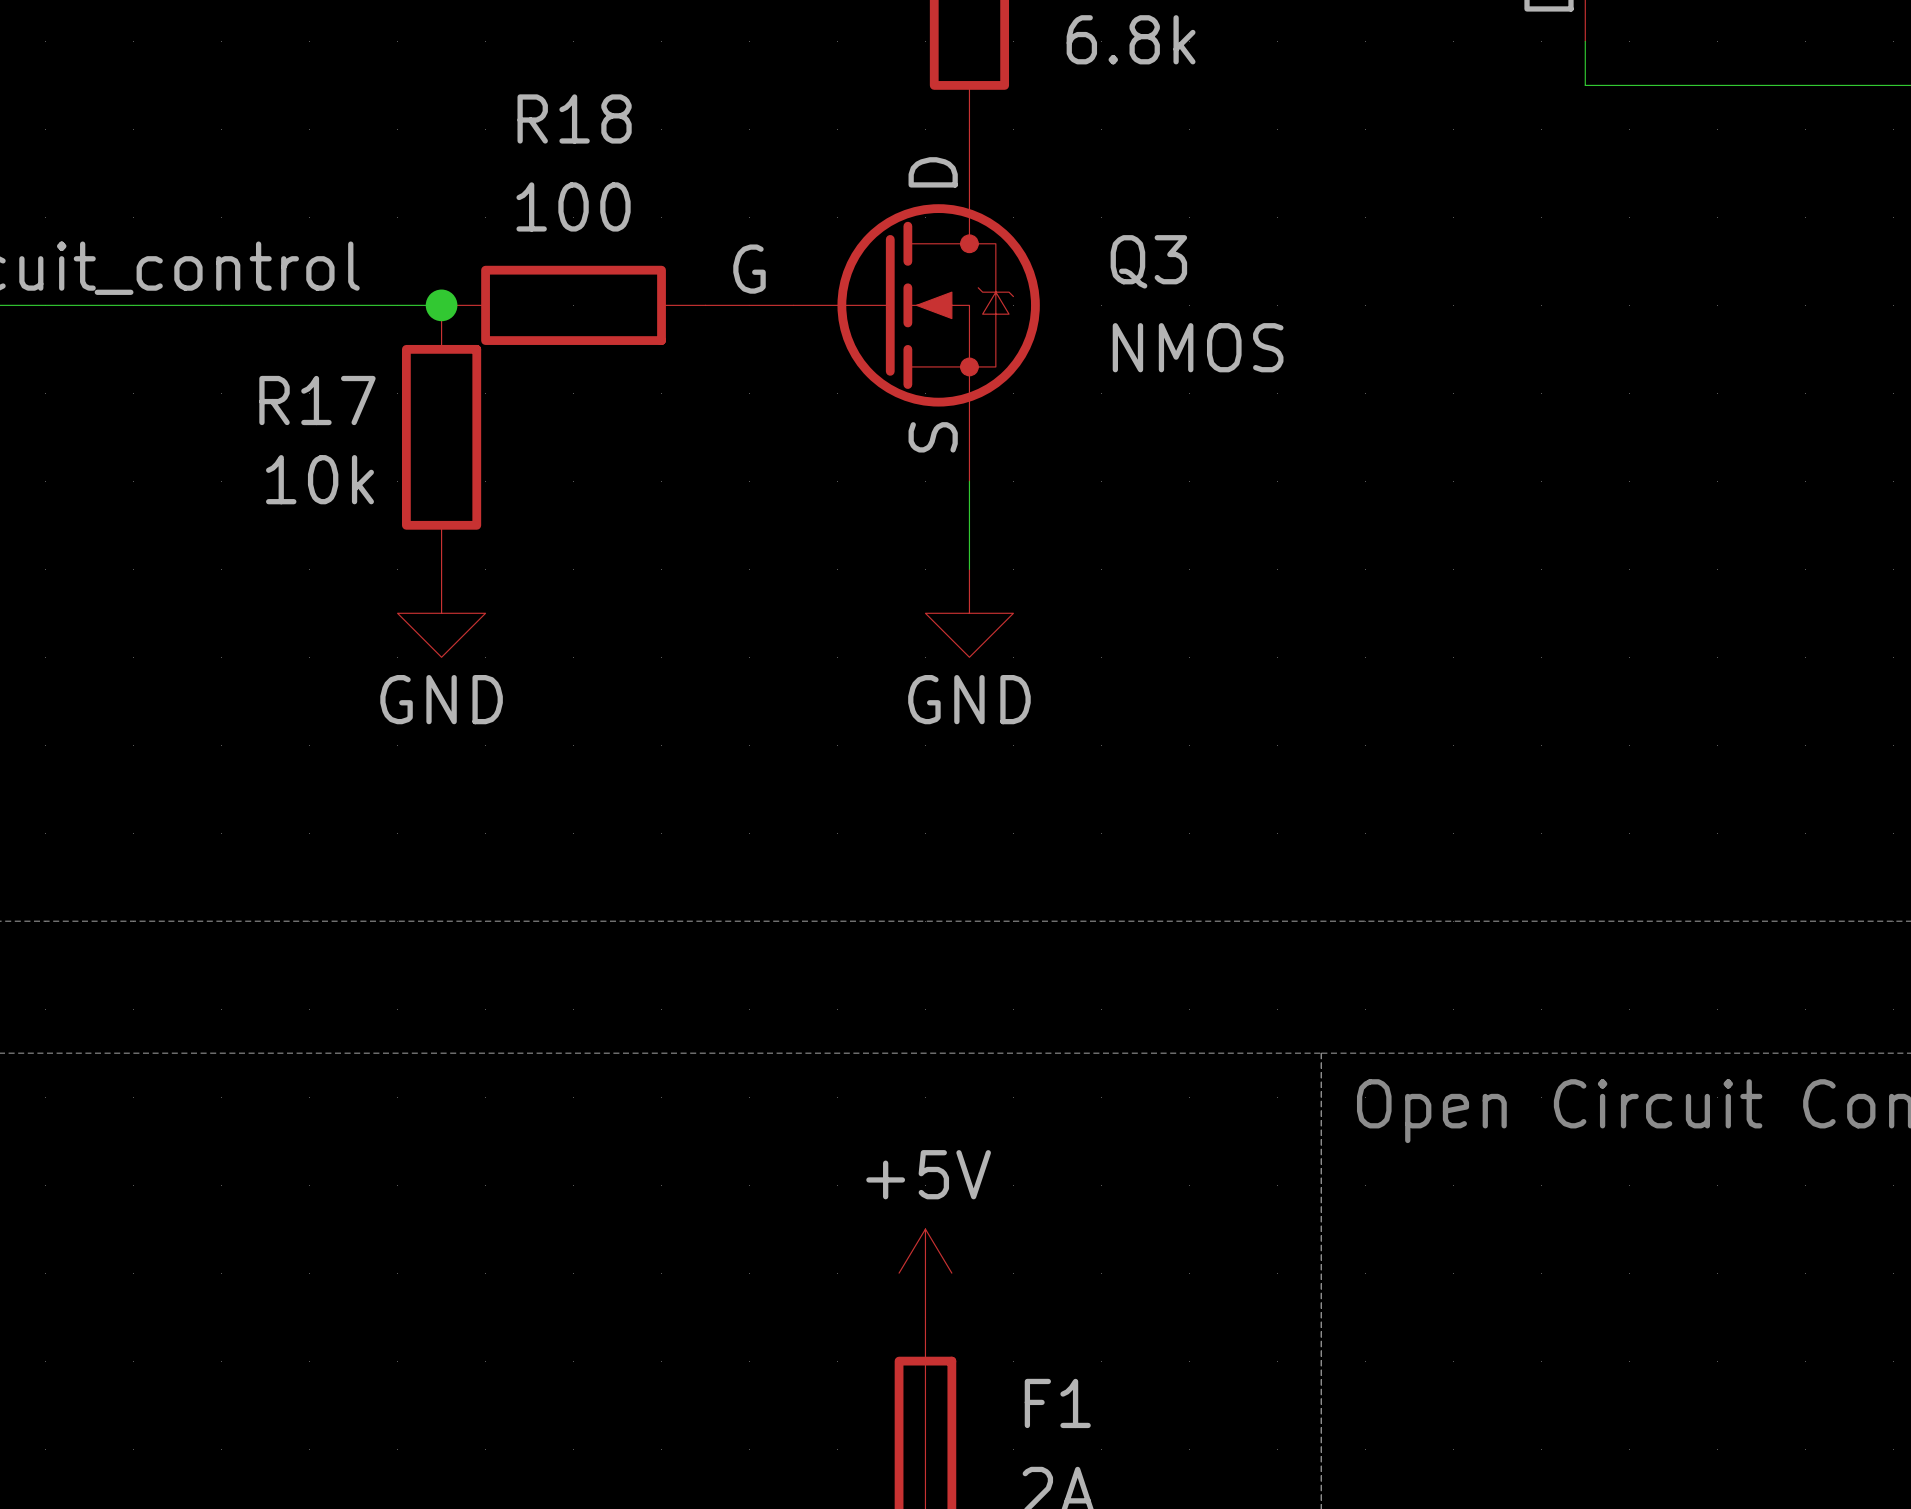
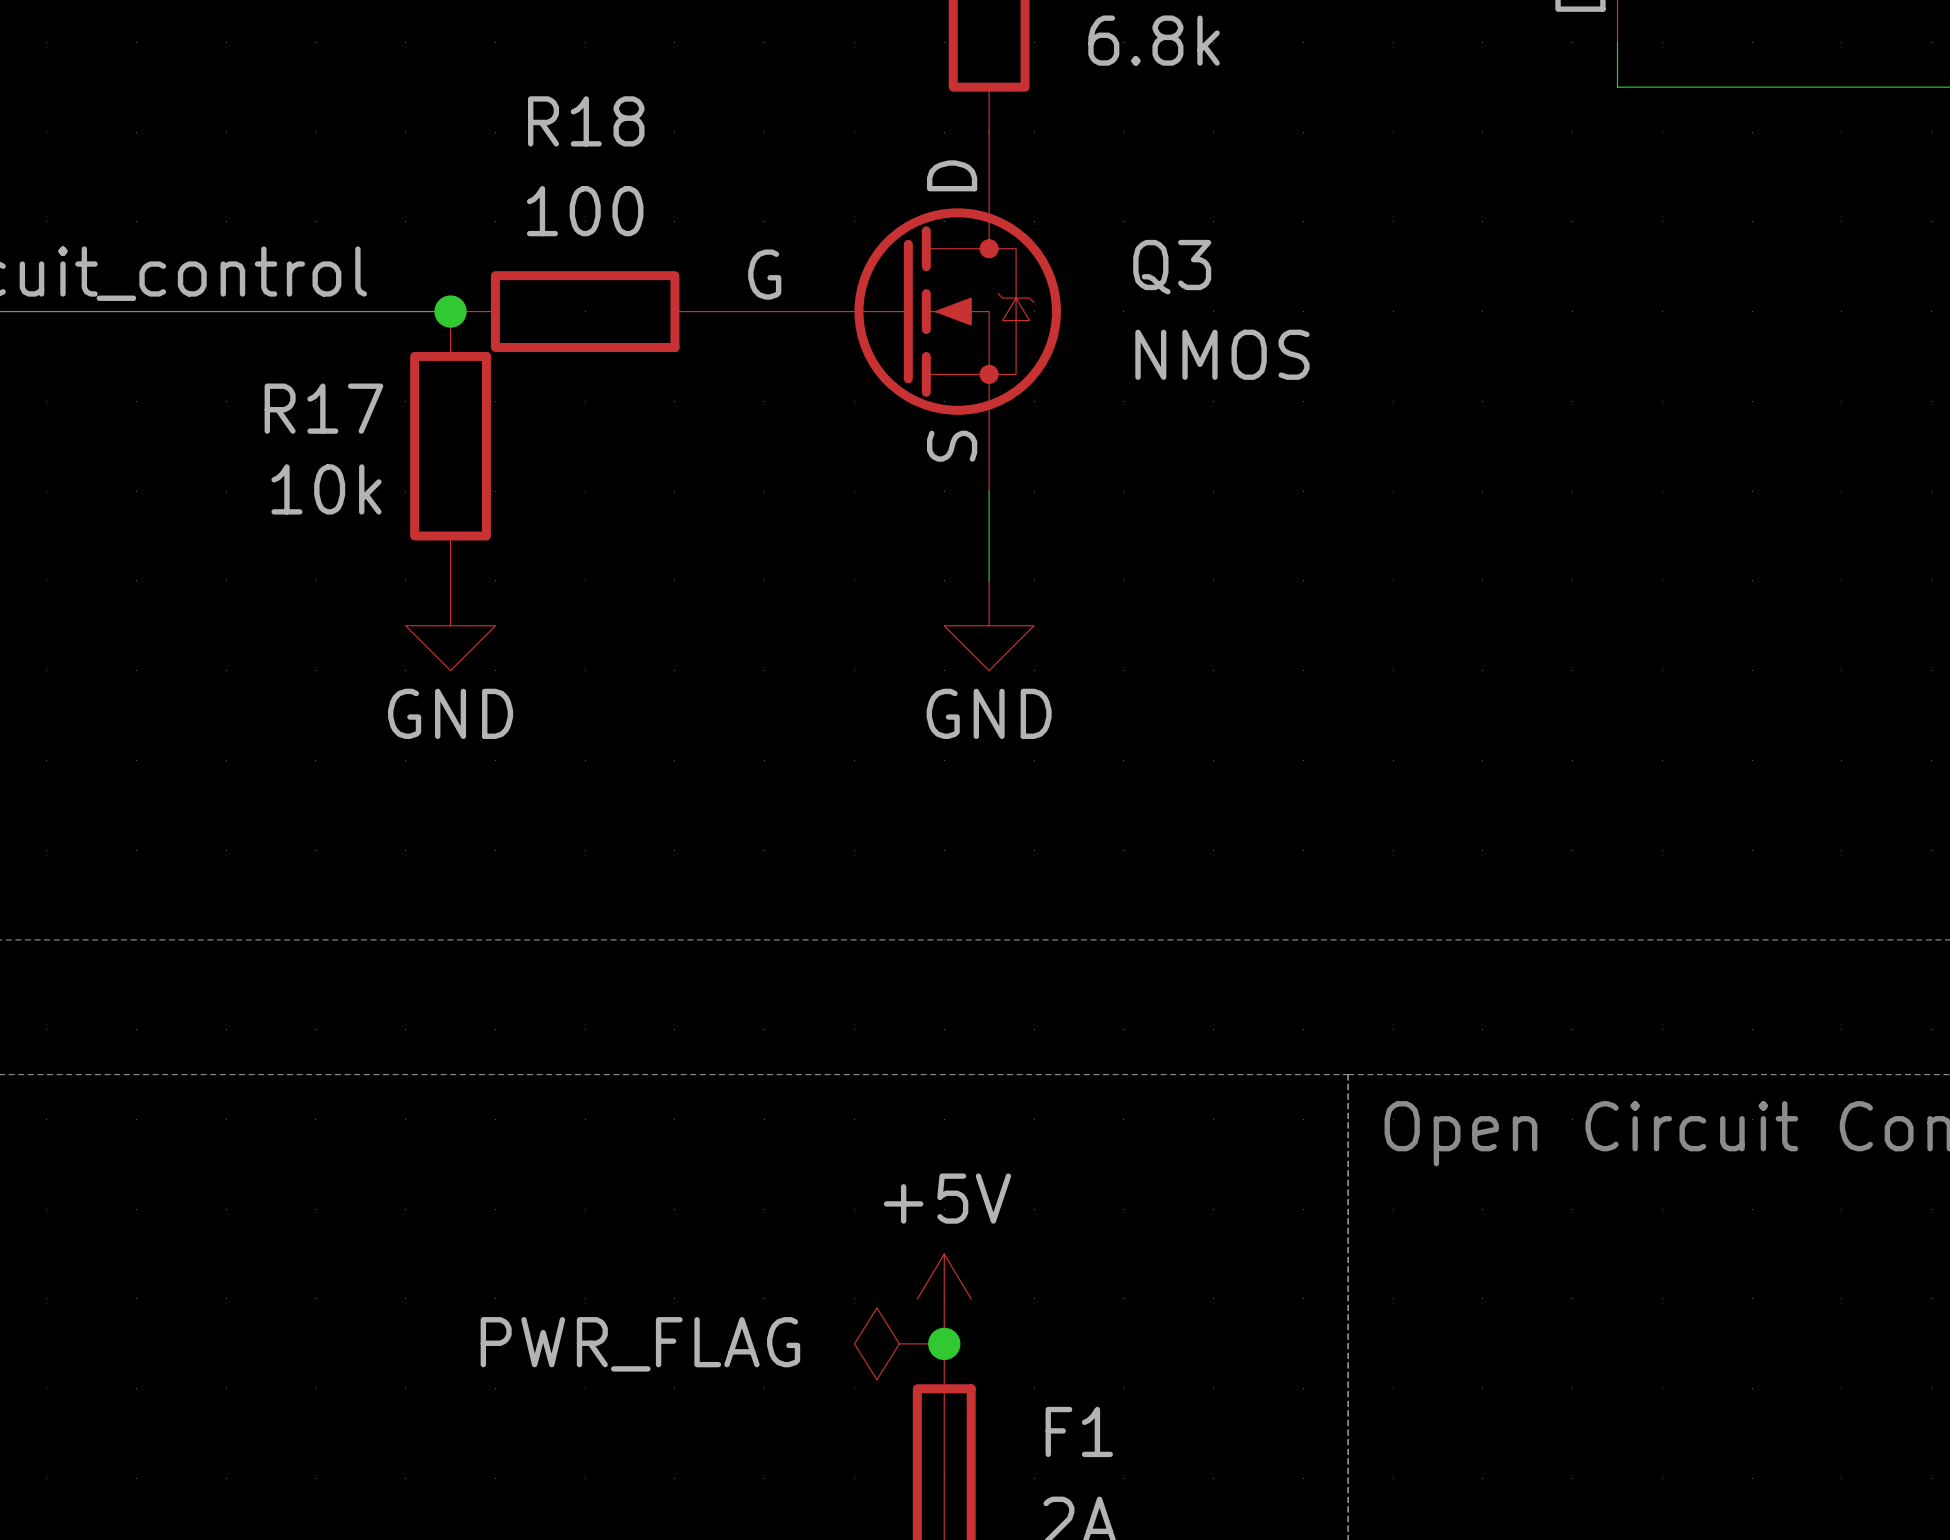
power symbol: none -> PWR_FLAG (899, 1343)
junction: none -> (944, 1343)

